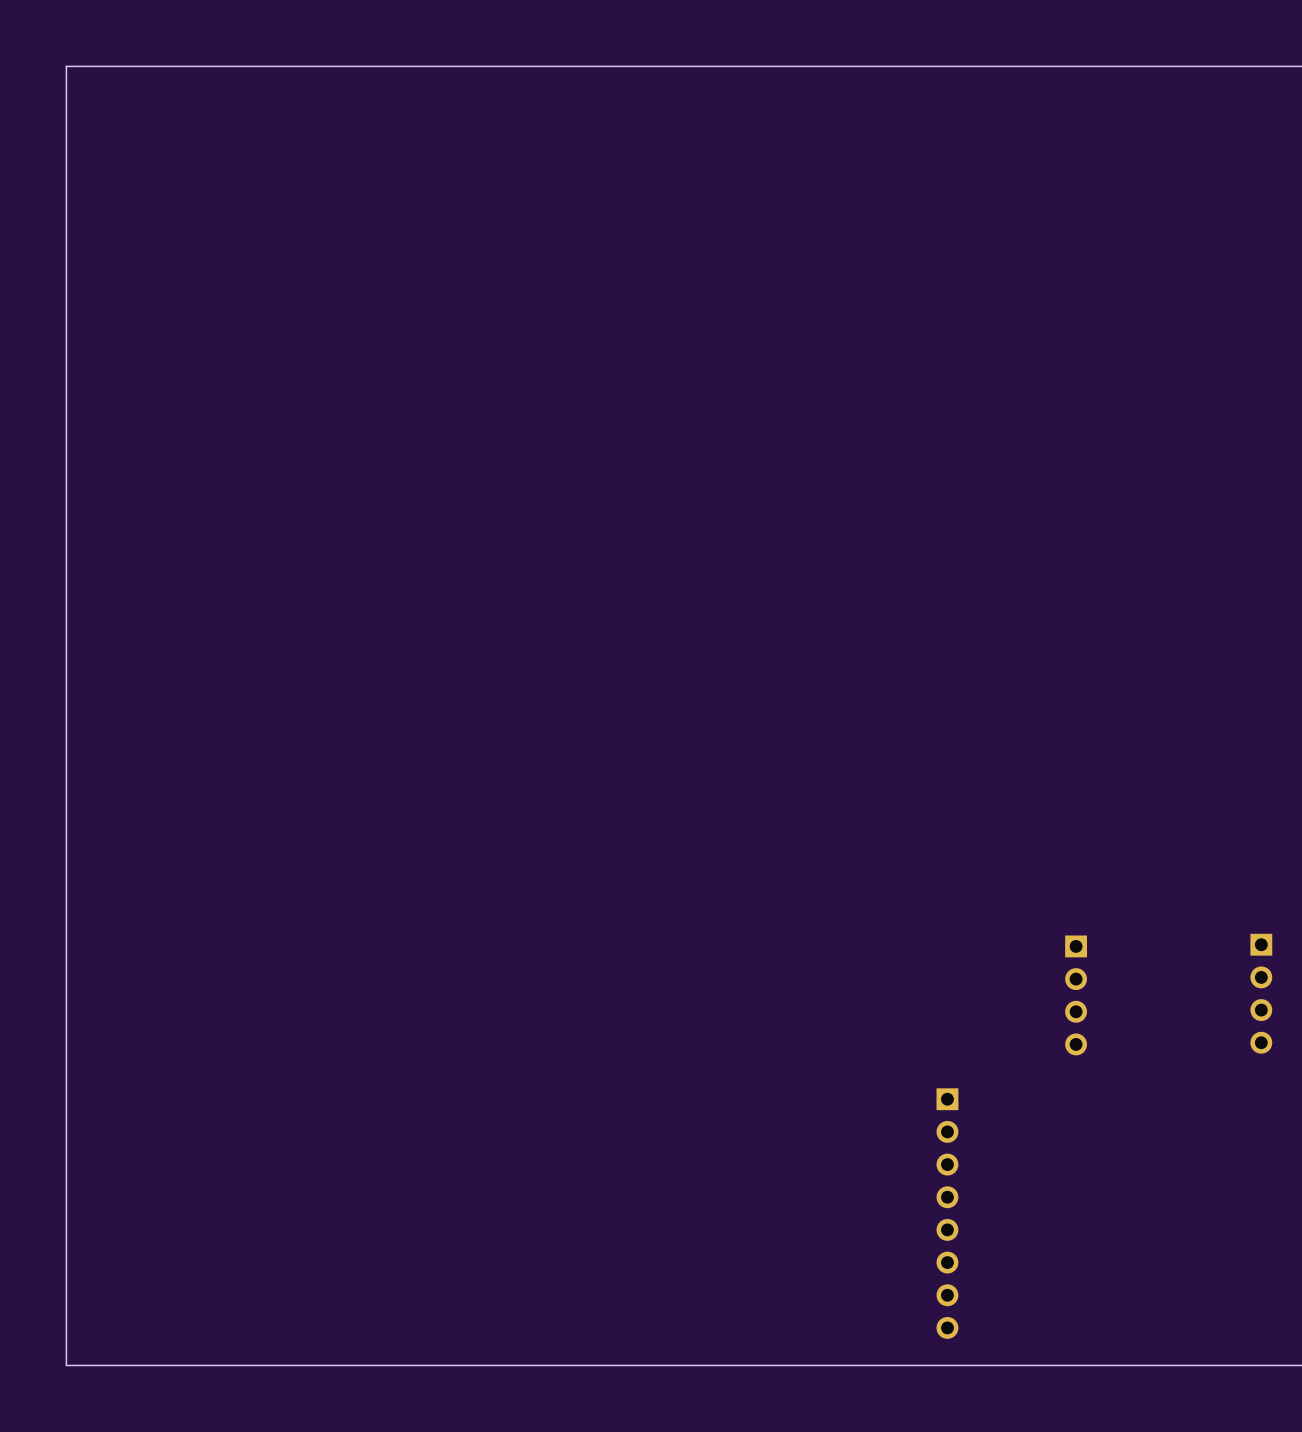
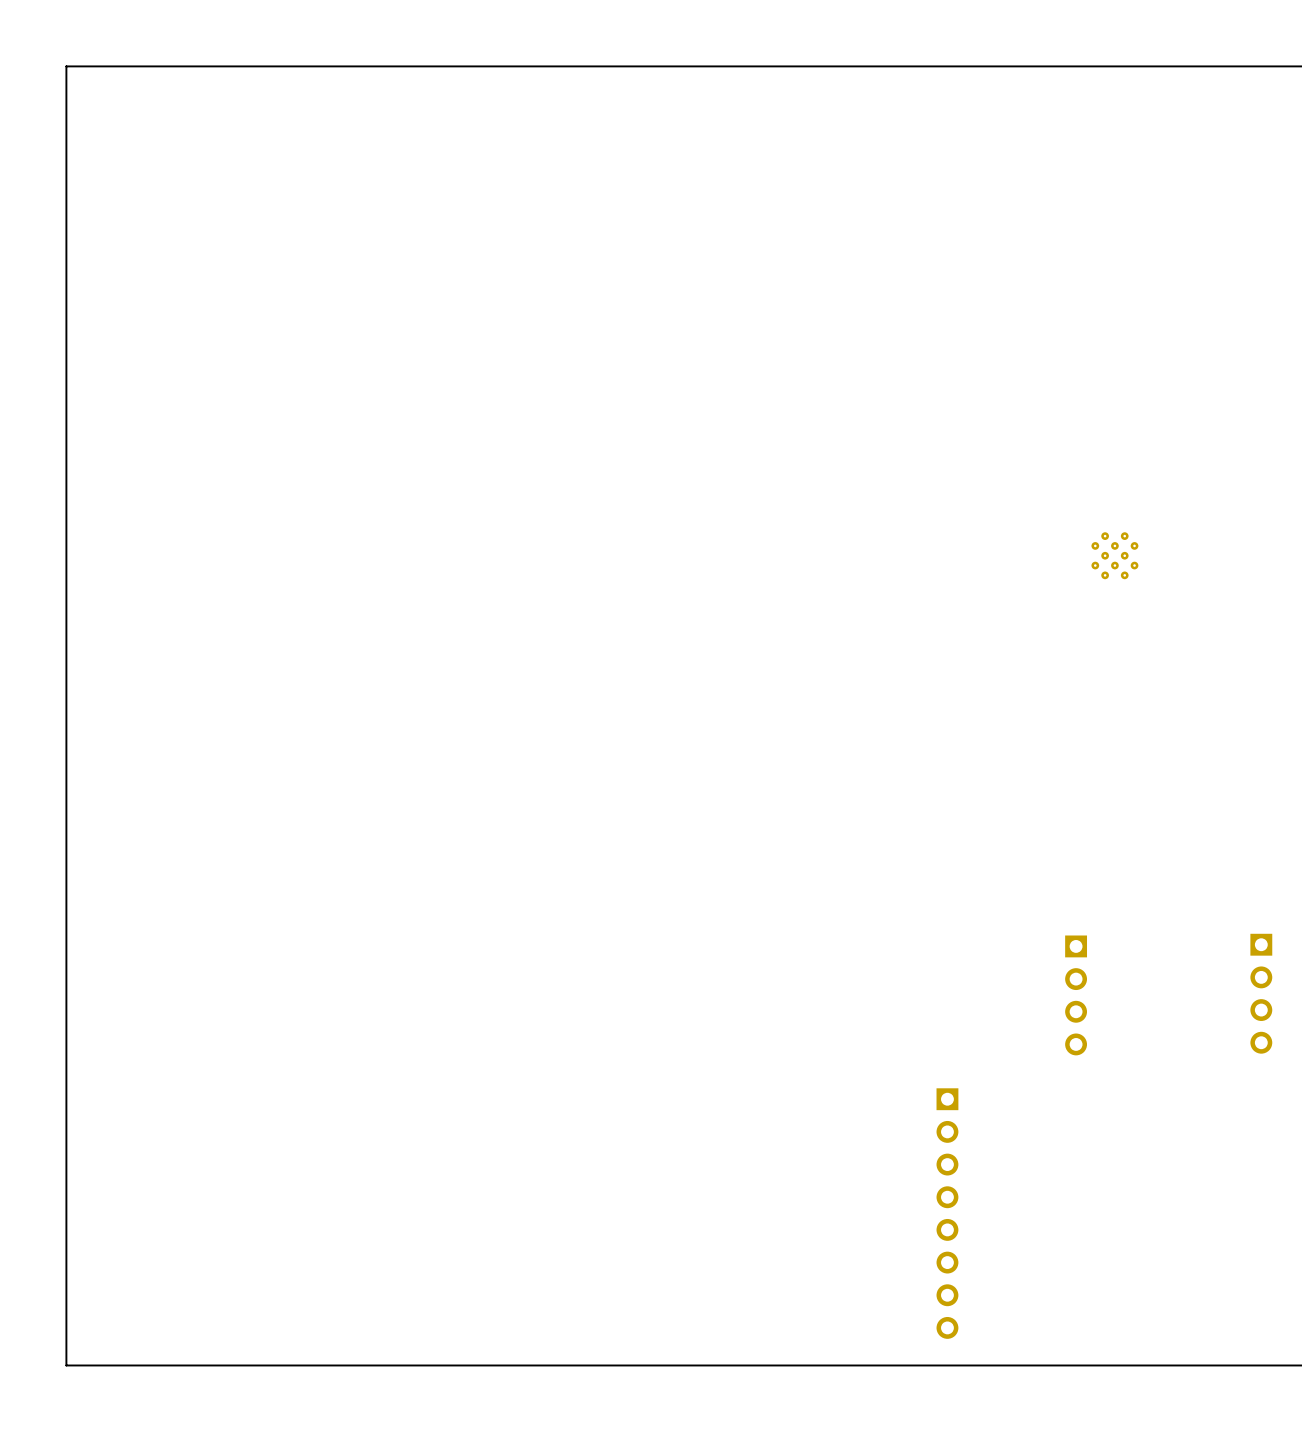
part: none -> (1114, 555)

